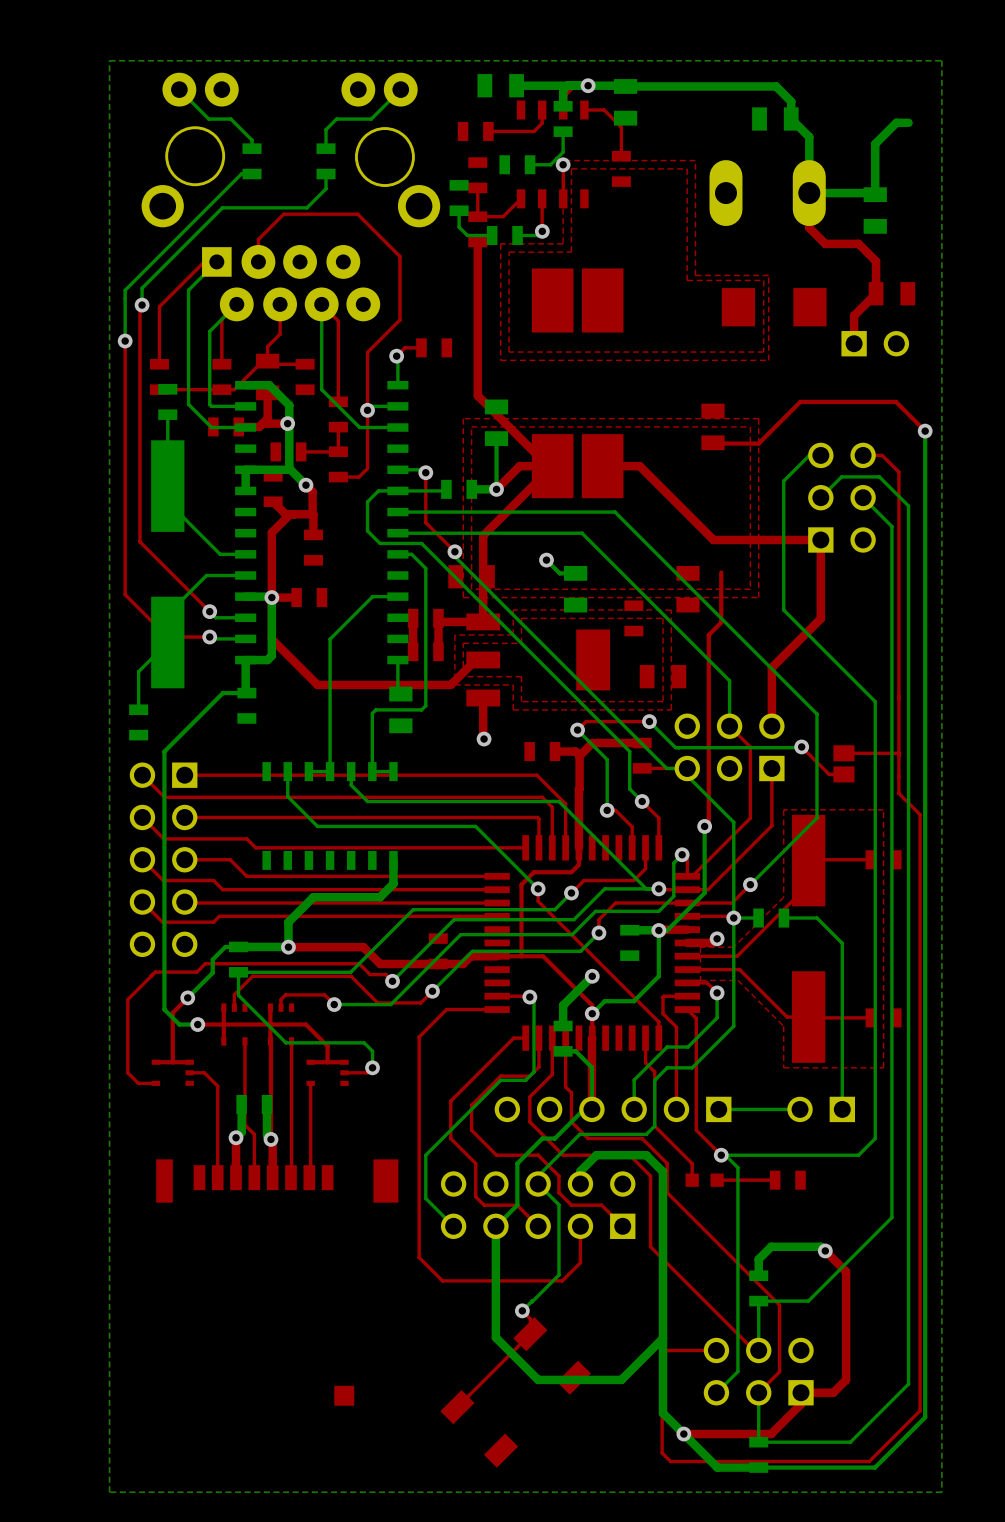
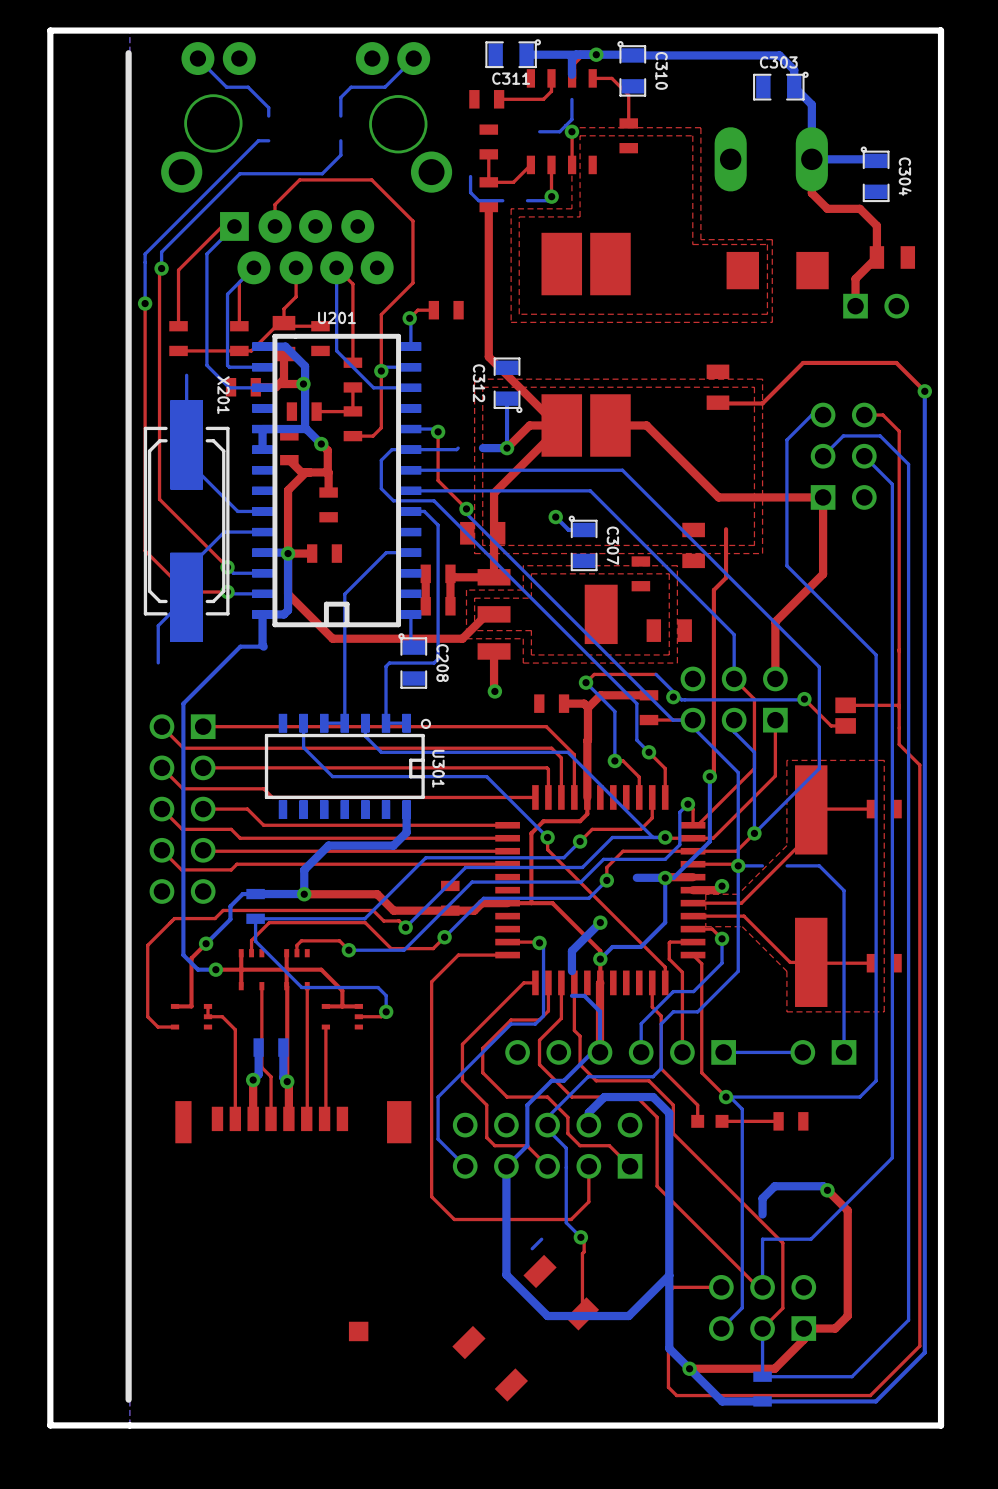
board edge: none -> (941, 30) (941, 1425) (129, 1425)
board edge: none -> (940, 31) (50, 30) (50, 1425) (129, 1425)
line: none -> (128, 53) (128, 1399)
C311: none -> (513, 53)
part: (500, 85) -> none
C310: none -> (631, 68)
part: (625, 102) -> none
C303: none -> (780, 86)
part: (563, 118) -> none
part: (775, 118) -> none
bottom track: (908, 122) (896, 122) (875, 143) (875, 194) -> none
part: (252, 161) -> none
part: (326, 161) -> none
part: (517, 164) -> none
part: (459, 198) -> none
C304: none -> (875, 174)
part: (875, 210) -> none
part: (504, 235) -> none
part: (167, 401) -> none
part: (496, 422) -> none
C312: none -> (508, 385)
part: (459, 489) -> none
U201: none -> (336, 480)
X201: none -> (186, 521)
C307: none -> (583, 543)
part: (575, 589) -> none
part: (246, 705) -> none
C208: none -> (412, 660)
part: (400, 709) -> none
via position: (649, 721) -> (673, 697)
part: (138, 722) -> none
drawing: none -> [420, 718, 432, 730]
bottom track: none -> (734, 720) (734, 732) (754, 752) (754, 833)
U301: none -> (344, 766)
part: (771, 918) -> none
part: (629, 942) -> none
part: (563, 1038) -> none
top track: (189, 1062) (172, 1062) -> (208, 1006) (208, 1016)
bottom track: (538, 1184) (558, 1204) (558, 1275) (532, 1300) -> (547, 1125) (547, 1129) (566, 1148) (566, 1222) (580, 1237)
part: (758, 1288) -> none
top track: none -> (580, 1237) (584, 1240) (582, 1312)
top track: (522, 1310) (530, 1318) (530, 1334) (457, 1407) -> none
via position: (522, 1310) -> (580, 1237)

